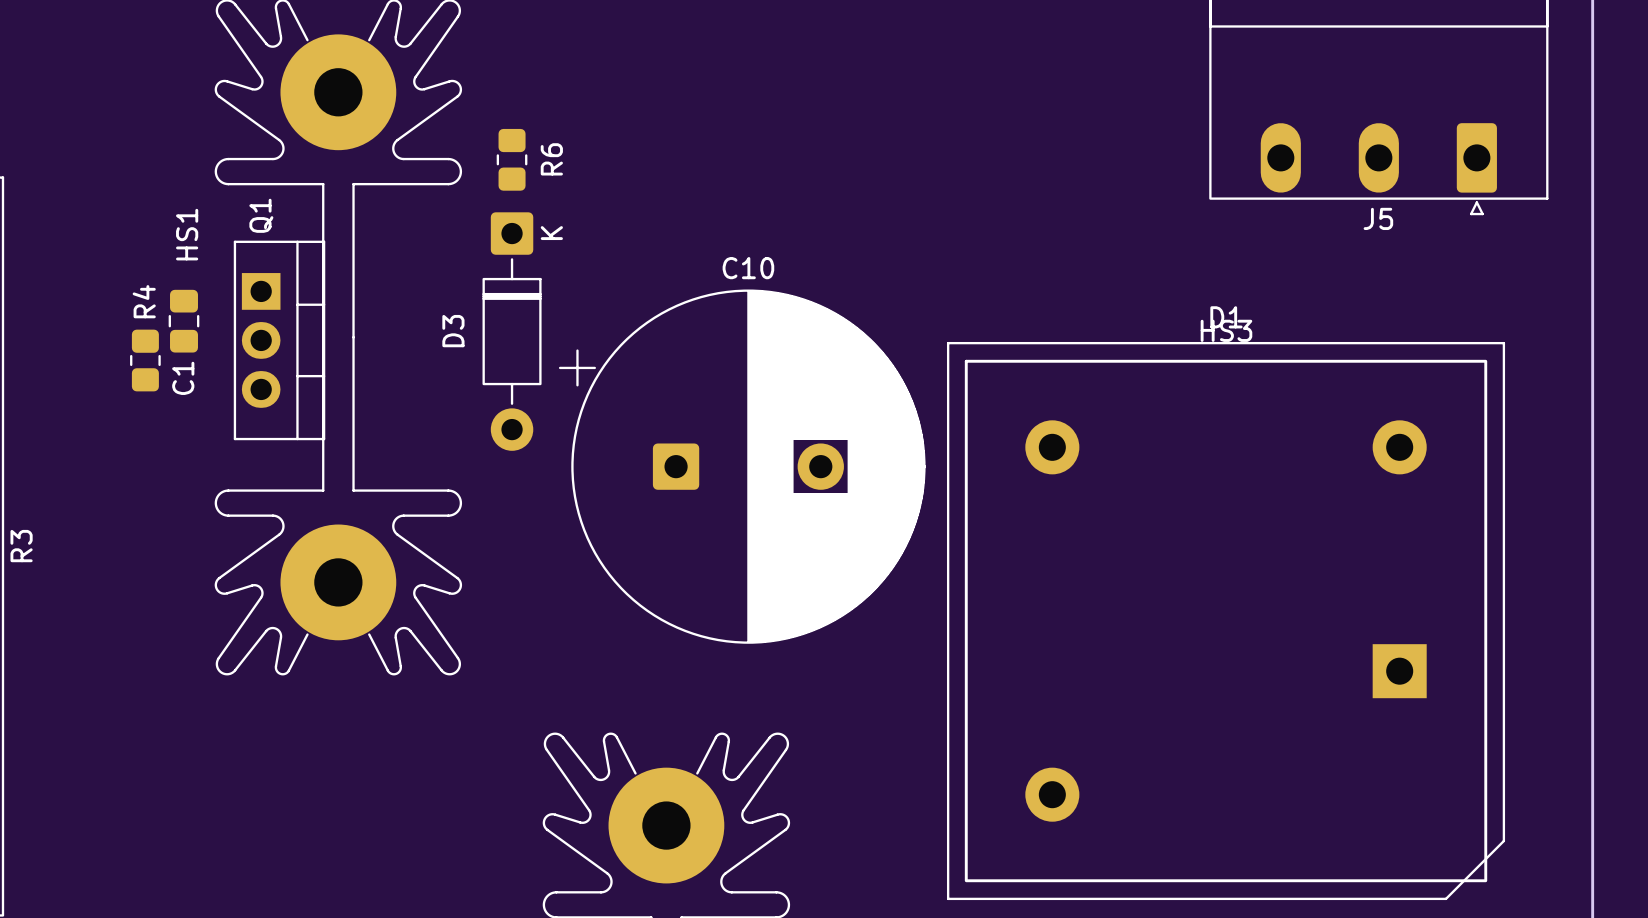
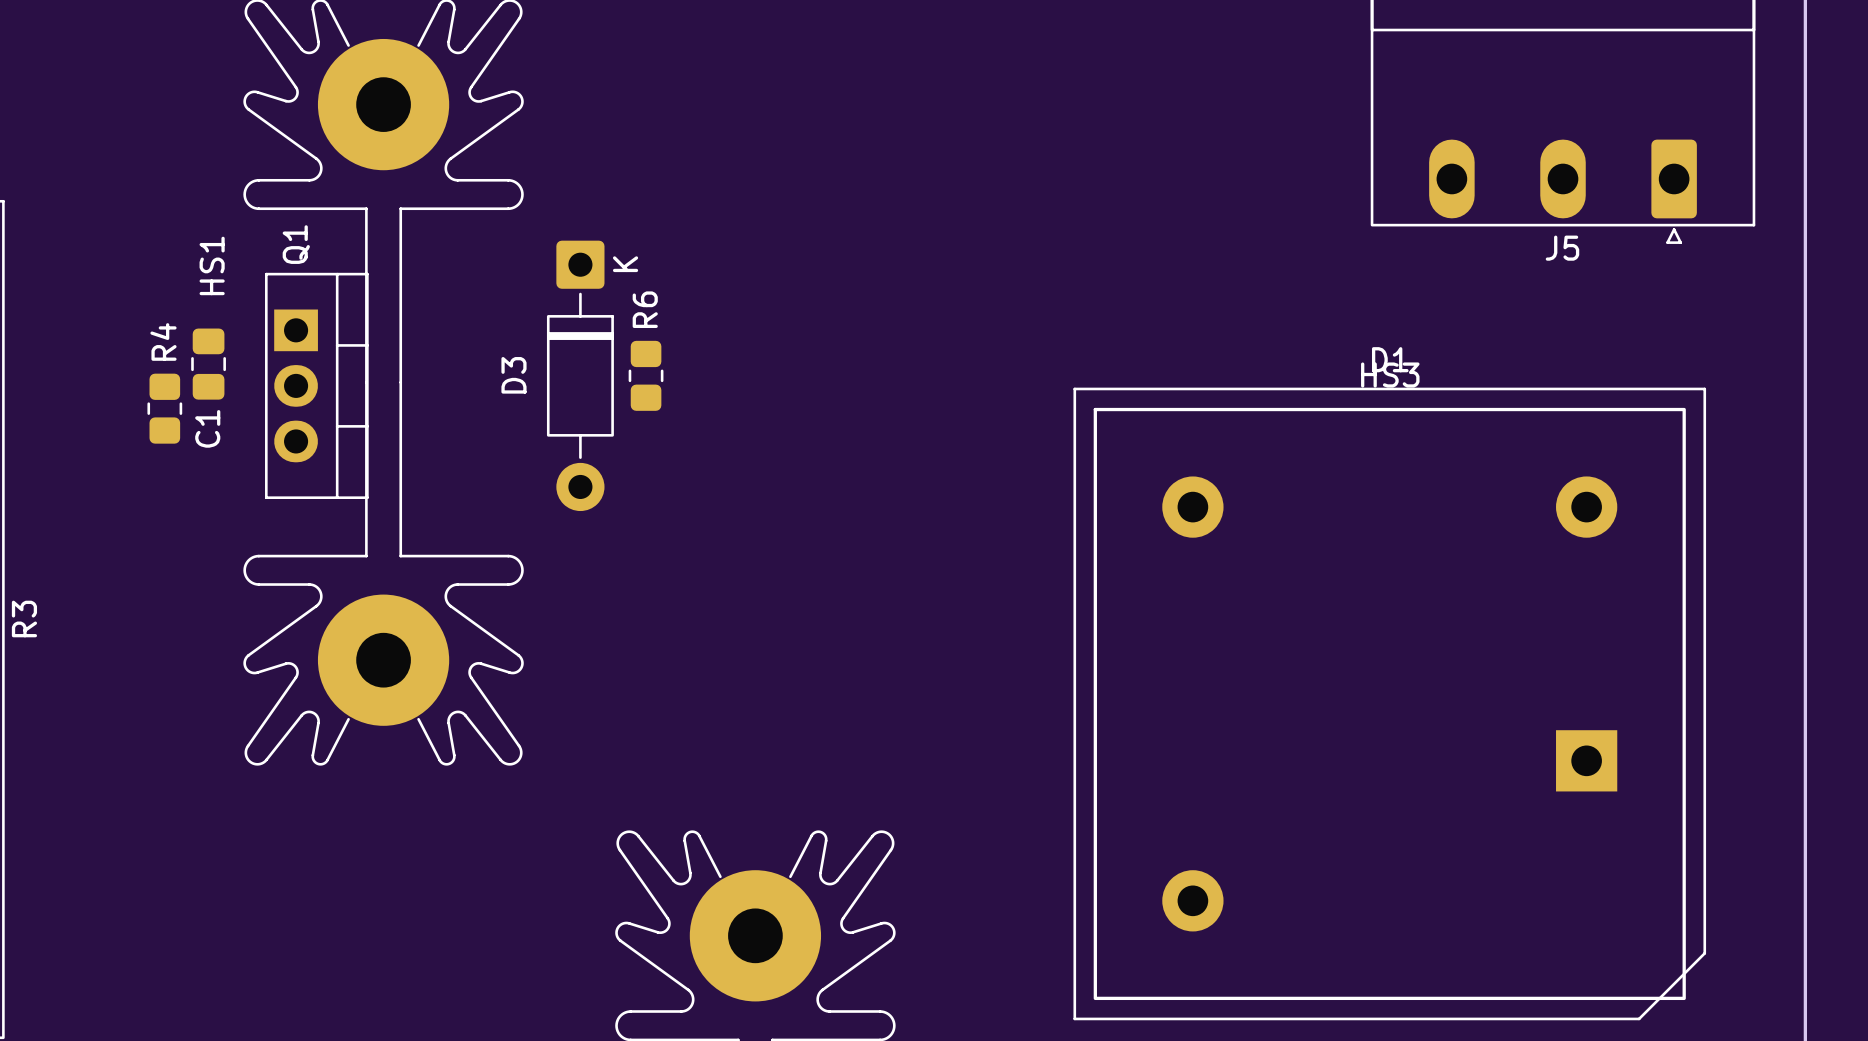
R6 position: (512, 159) -> (646, 375)
R6 name position: R6 (551, 159) -> R6 (645, 309)
C10: (742, 466) -> none

